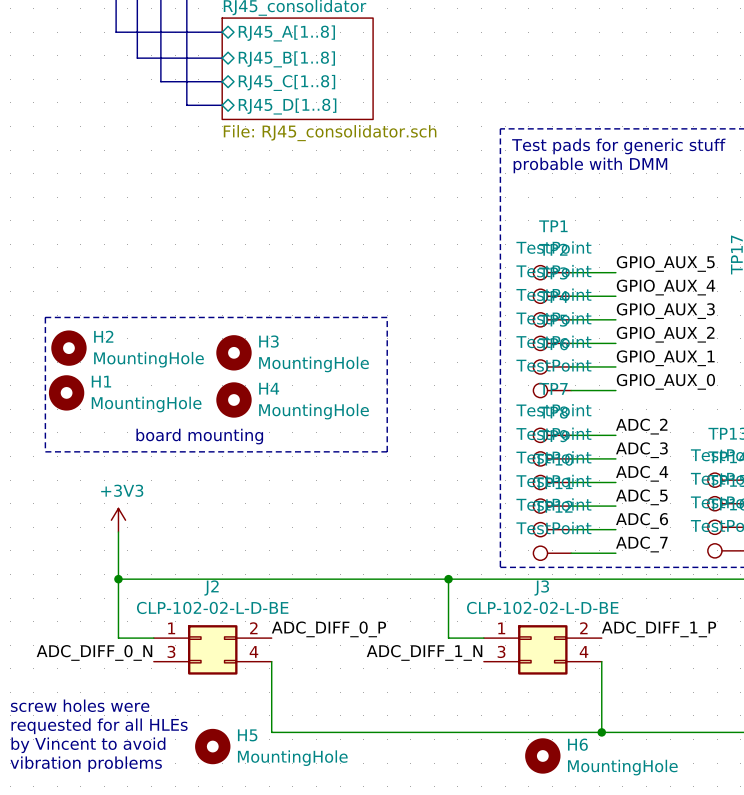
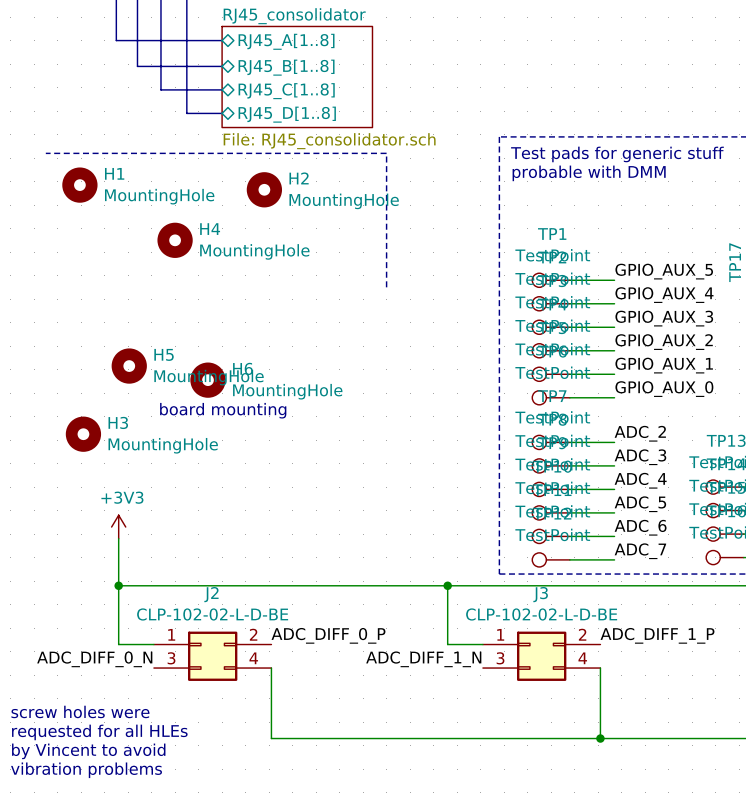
line: none -> (45, 153) (386, 153) (386, 287)
line: (45, 317) (387, 317) (387, 451) (45, 451) (45, 317) -> none
H2 position: (68, 348) -> (264, 189)
H3 position: (233, 352) -> (83, 434)
H1 position: (66, 392) -> (79, 185)
H4 position: (233, 399) -> (175, 240)
text position: board mounting (199, 436) -> board mounting (223, 410)
H5 position: (212, 746) -> (129, 366)
H6 position: (542, 755) -> (207, 380)

